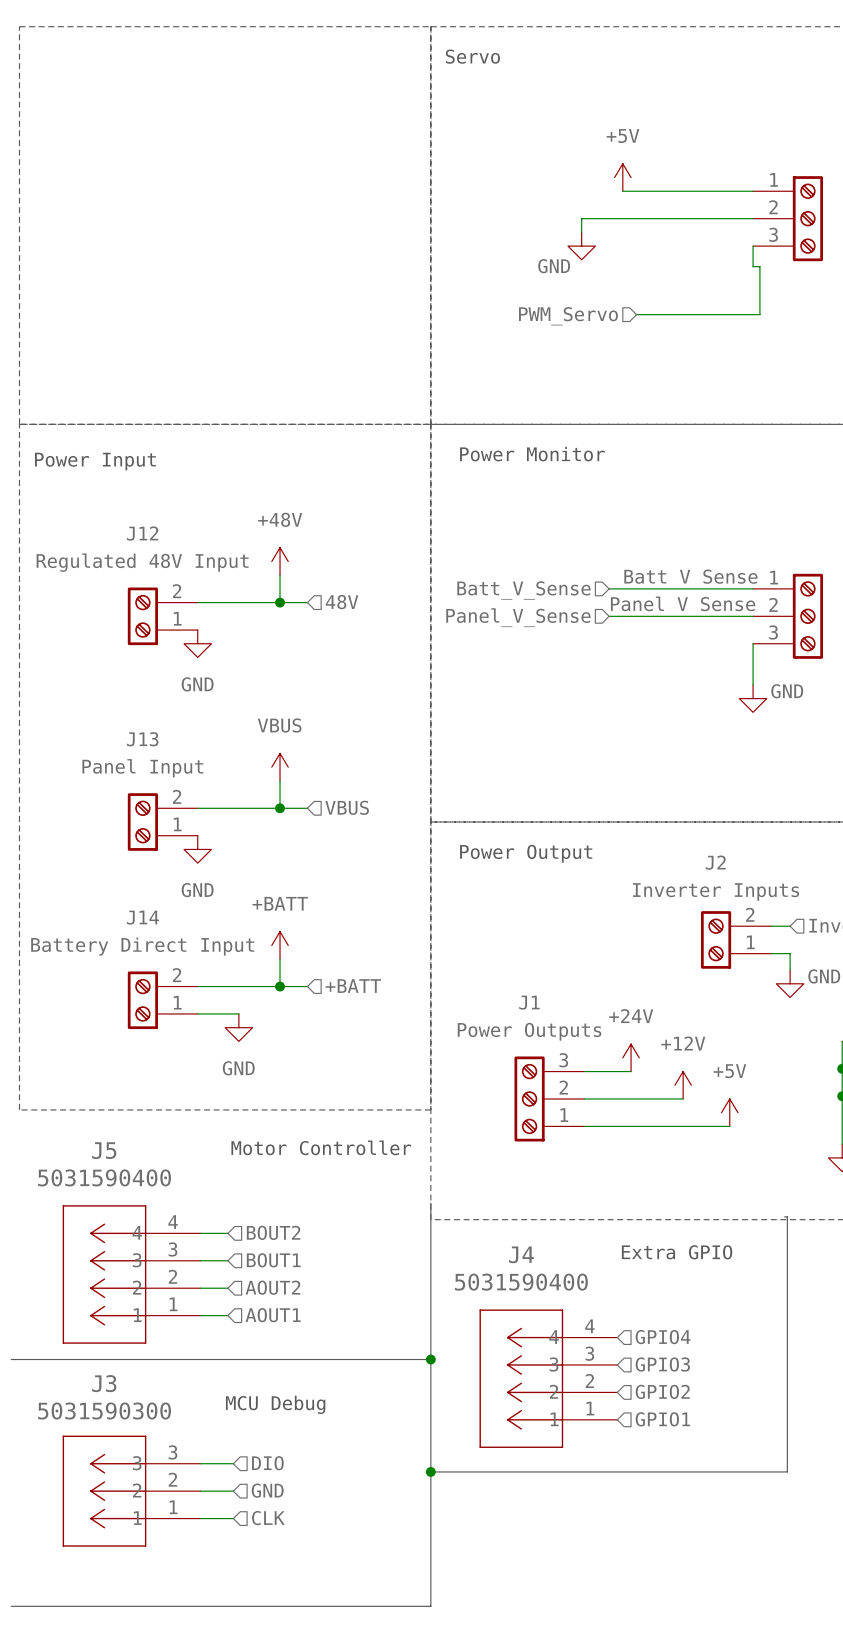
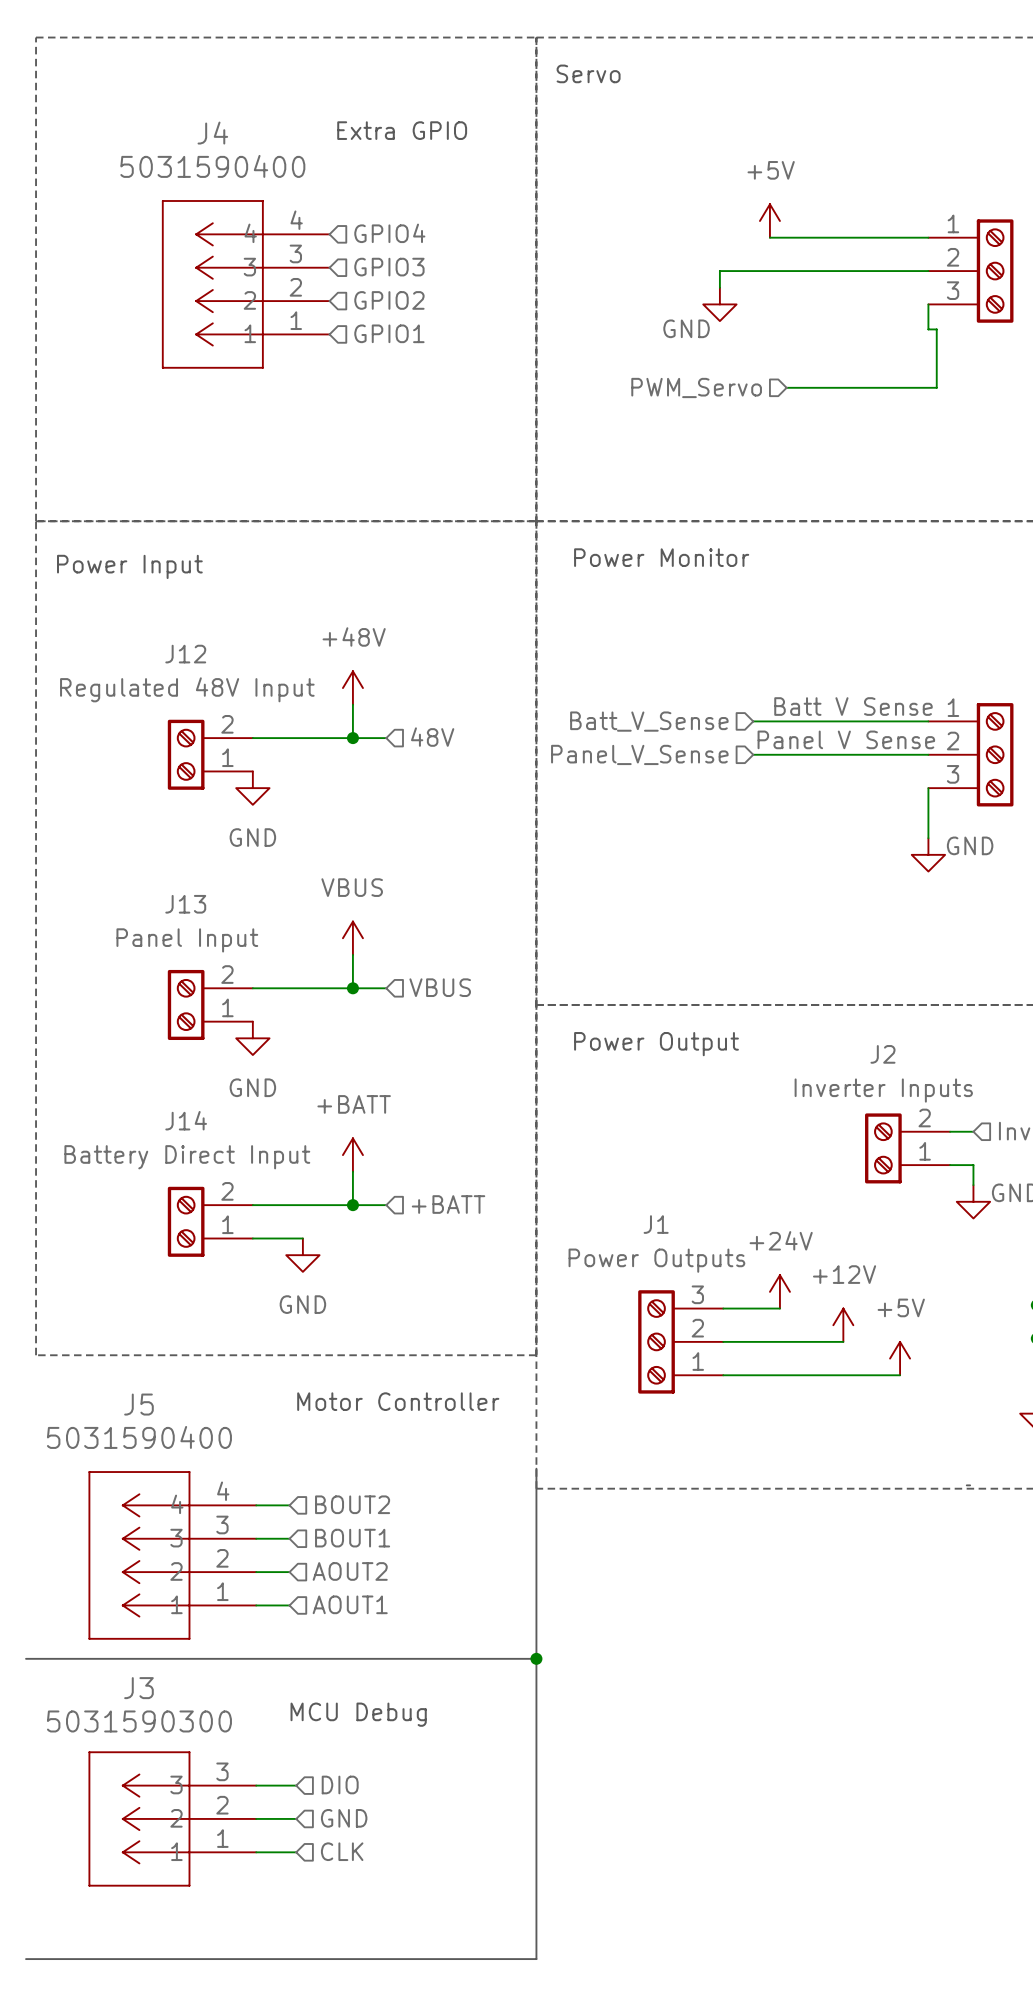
text: none -> Extra GPIO (402, 130)
hierarchical label: none -> GPIO4 (389, 233)
hierarchical label: none -> GPIO3 (389, 267)
hierarchical label: none -> GPIO2 (389, 300)
hierarchical label: none -> GPIO1 (389, 333)
bus: (787, 1216) (787, 1471) (430, 1471) -> none
text: Extra GPIO (677, 1252) -> none
hierarchical label: GPIO4 (663, 1337) -> none
hierarchical label: GPIO3 (662, 1364) -> none
J4 position: (548, 1378) -> (245, 284)
hierarchical label: GPIO2 (662, 1391) -> none
hierarchical label: GPIO1 (662, 1419) -> none
junction: (430, 1471) -> none

